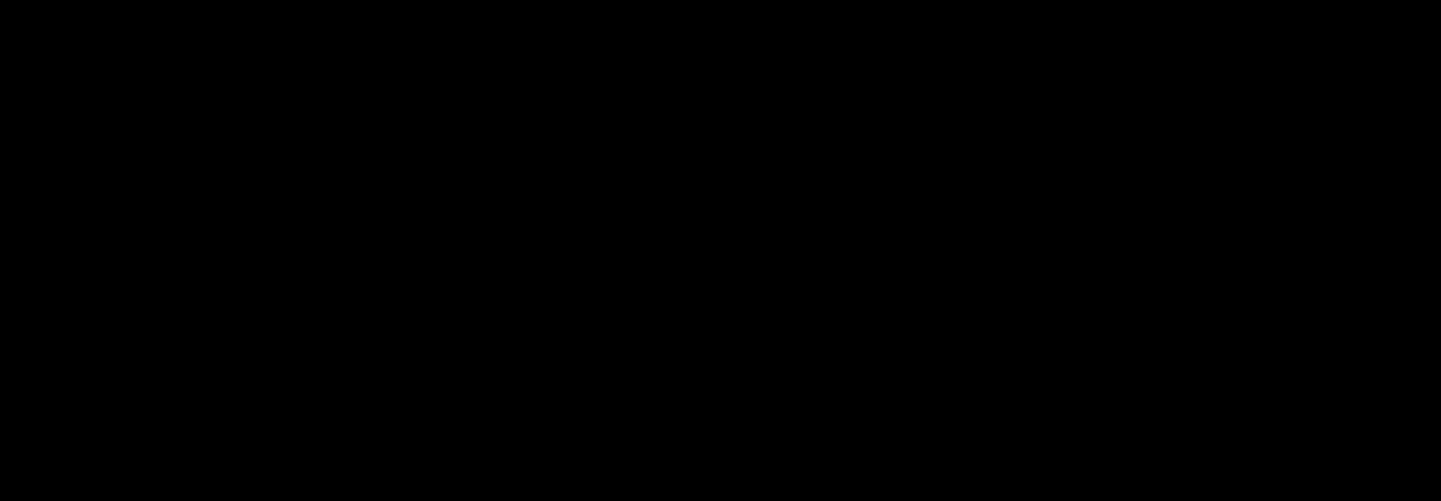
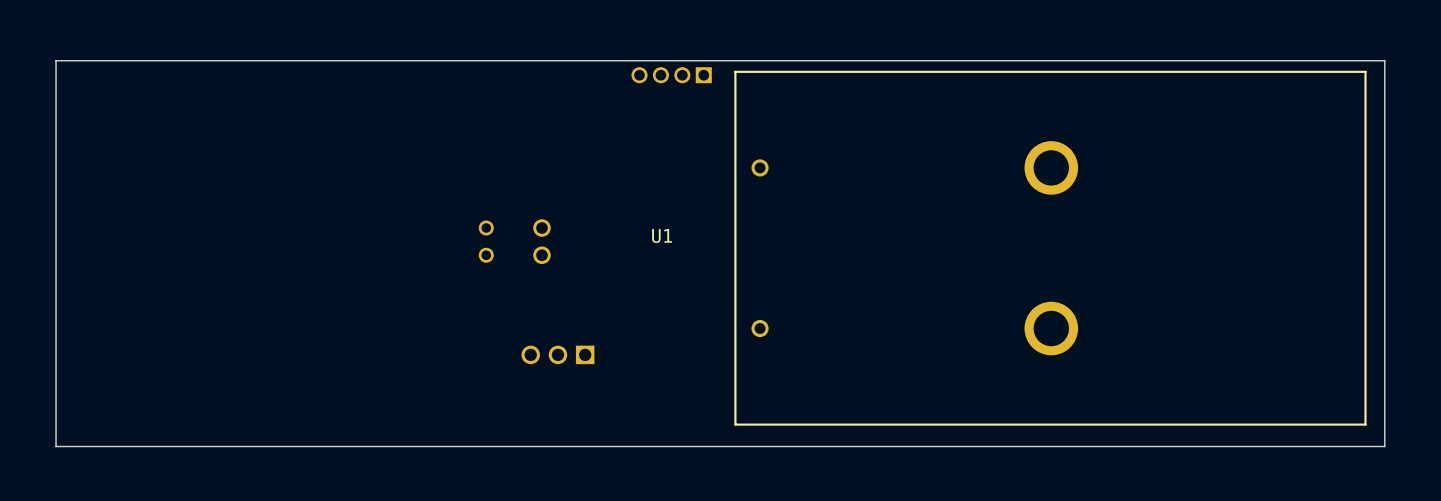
board edge: none -> (1384, 60) (56, 60) (56, 446) (1384, 446) (1384, 60)
part: none -> (671, 75)
part: none -> (486, 241)
part: none -> (541, 241)
U1: none -> (1050, 248)
part: none -> (557, 354)

